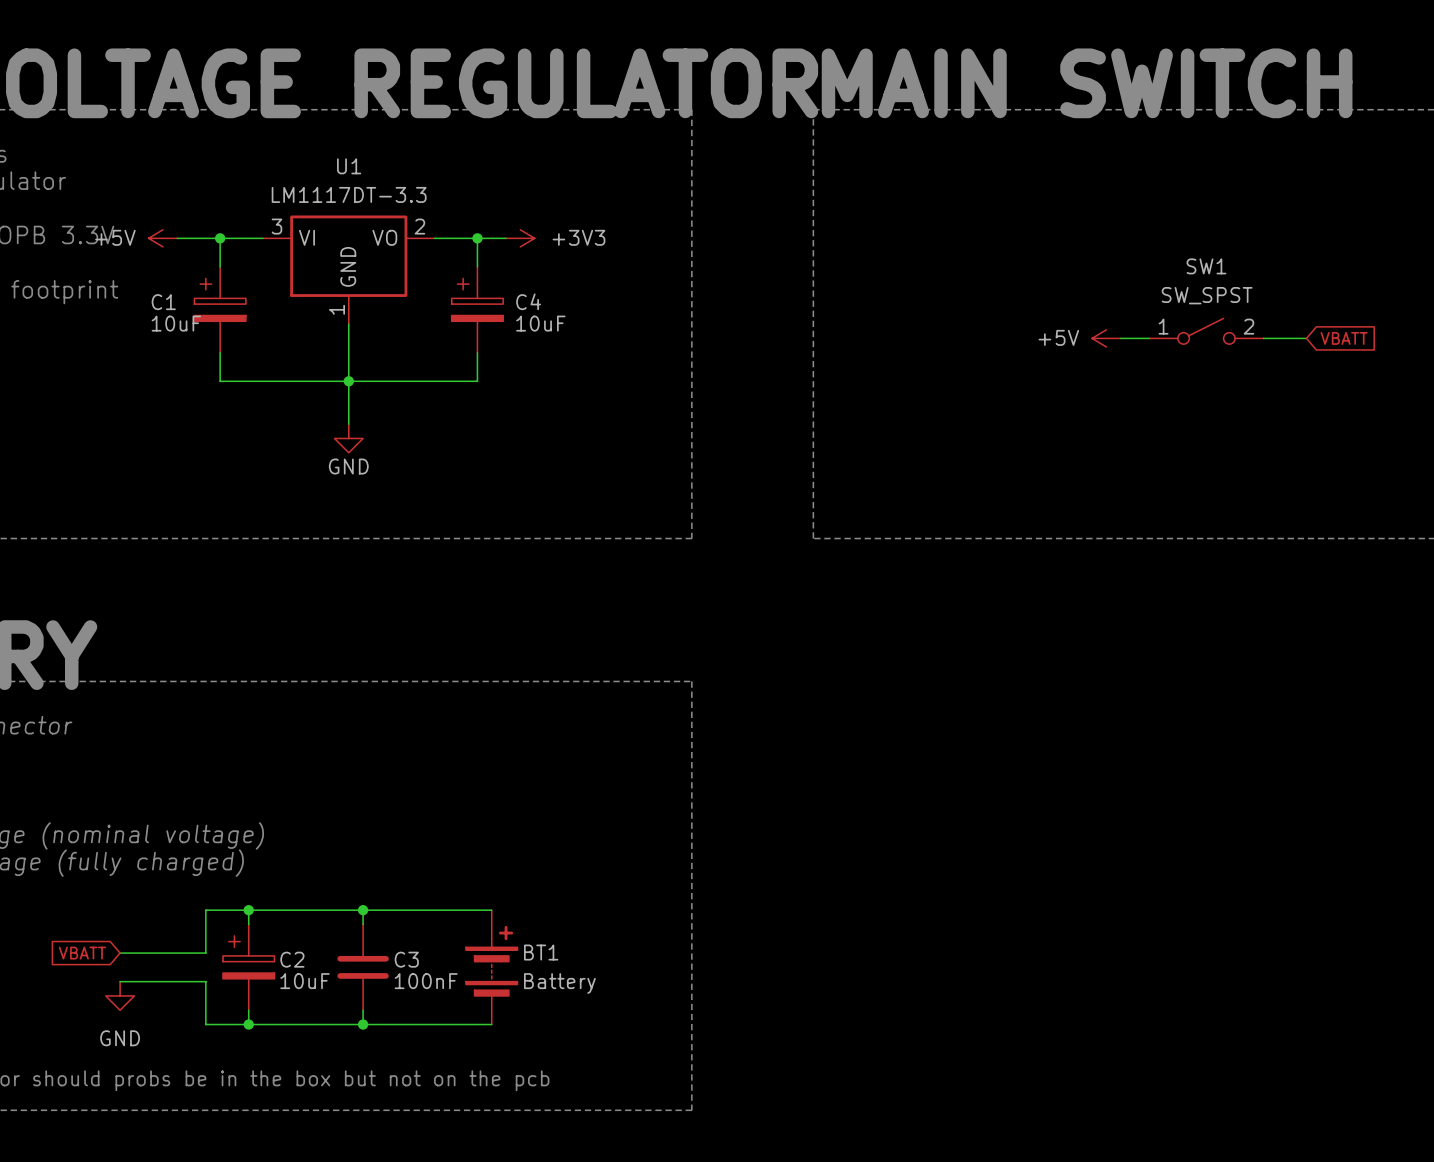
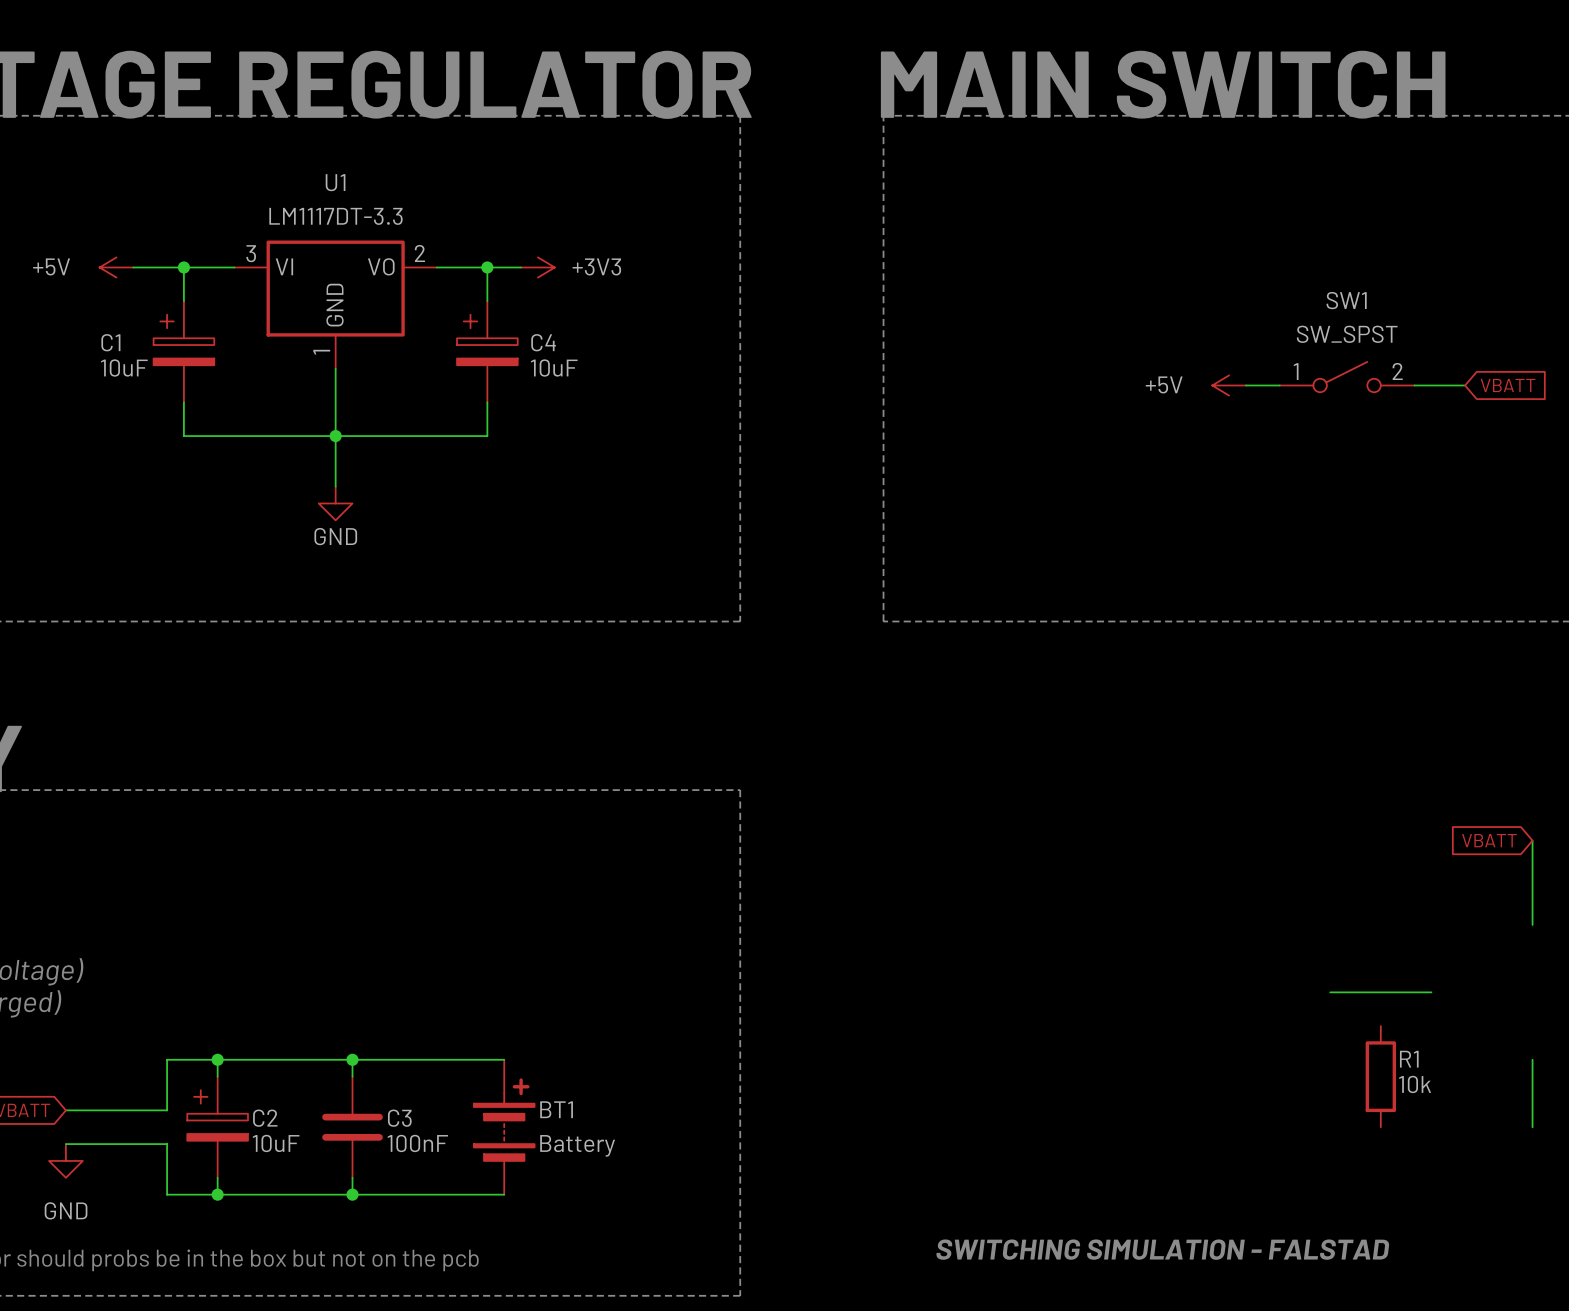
global label: none -> VBATT (1489, 840)
wire: none -> (1532, 840) (1532, 924)
wire: none -> (1330, 992) (1431, 992)
wire: none -> (1532, 1059) (1532, 1127)
R1: none -> 10k (1380, 1076)
text: none -> SWITCHING SIMULATION - FALSTAD (1162, 1249)

